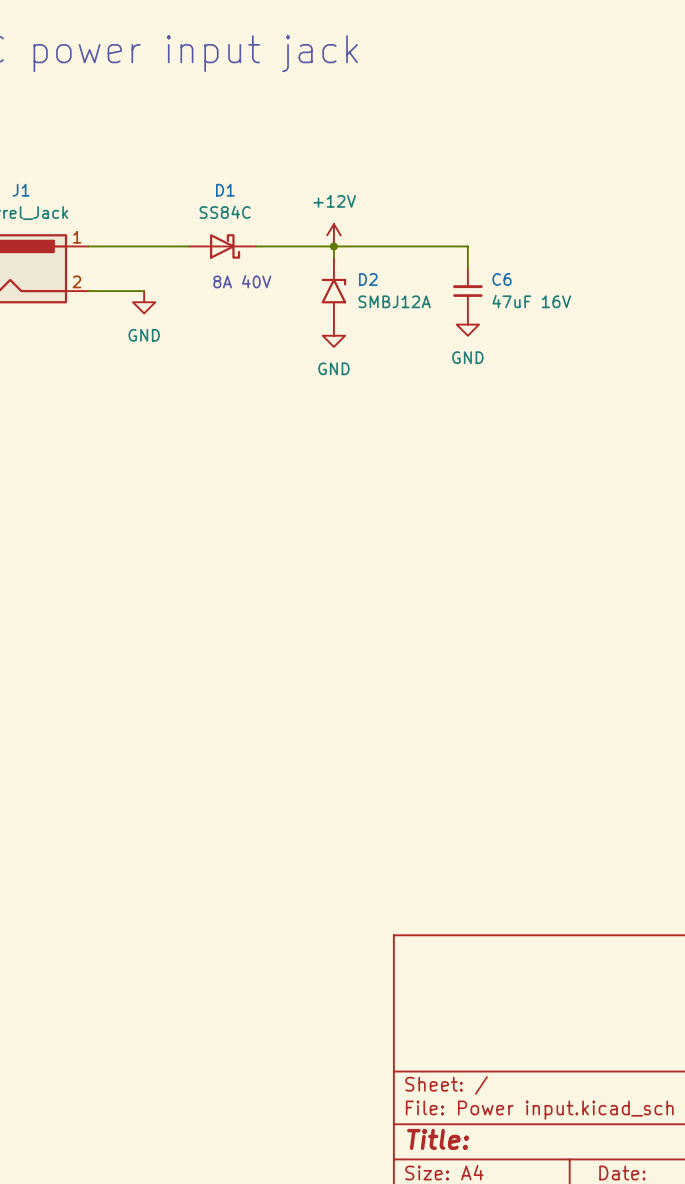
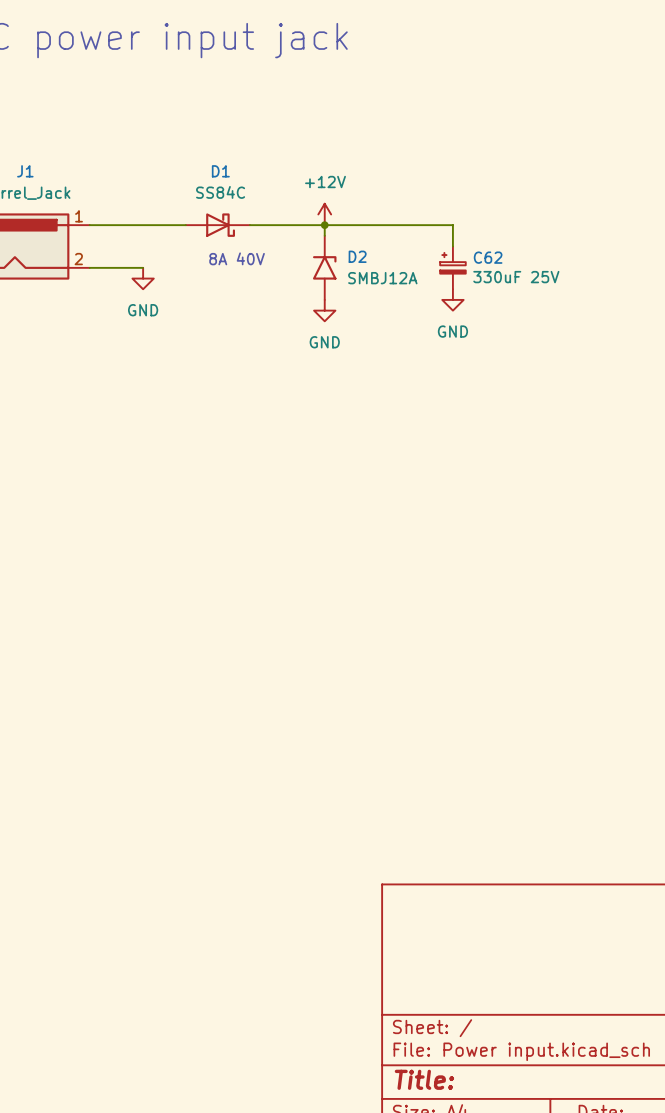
C6: 47uF 16V (467, 291) -> none
C62: none -> 330uF 25V (452, 267)

